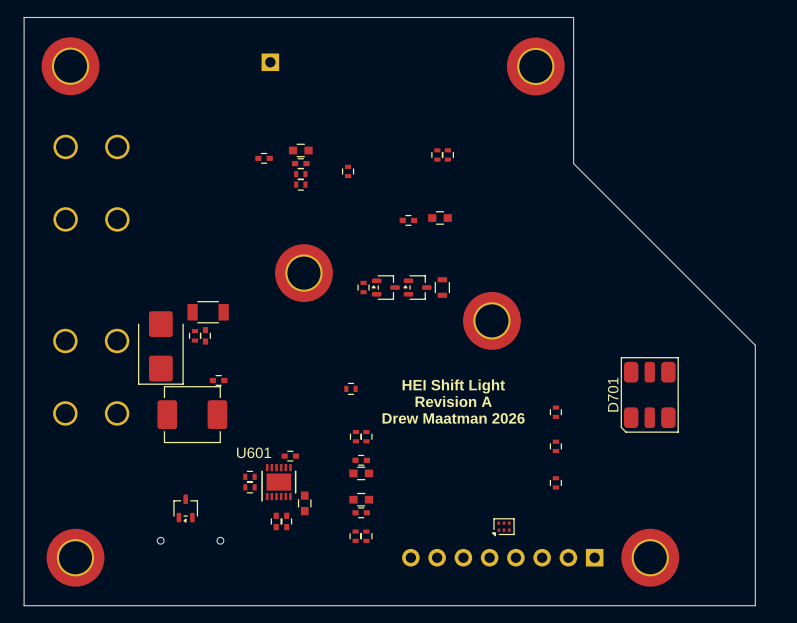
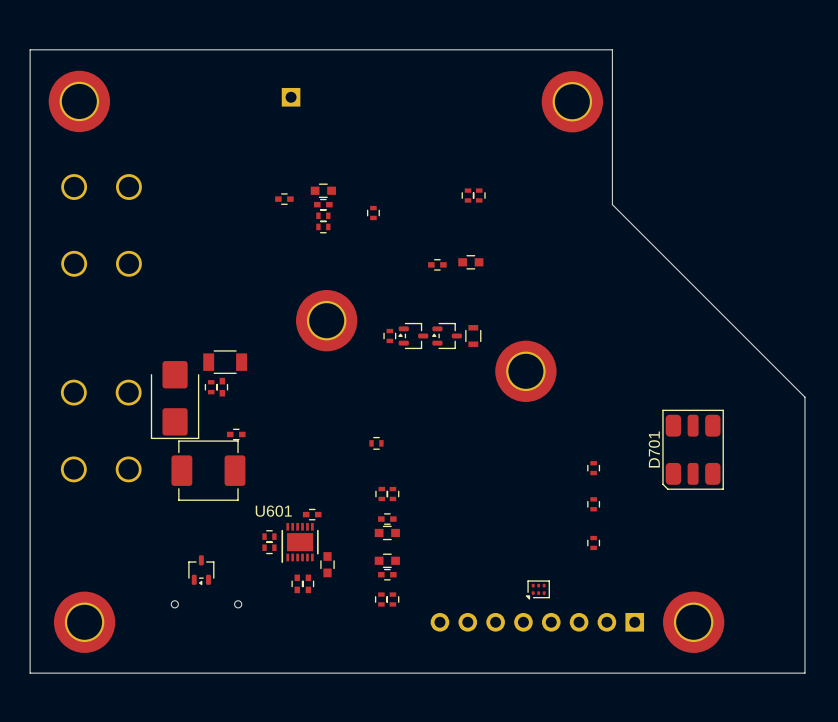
text: HEI Shift Light (453, 386) -> none
text: Revision A (453, 401) -> none
text: Drew Maatman 2026 (453, 418) -> none

